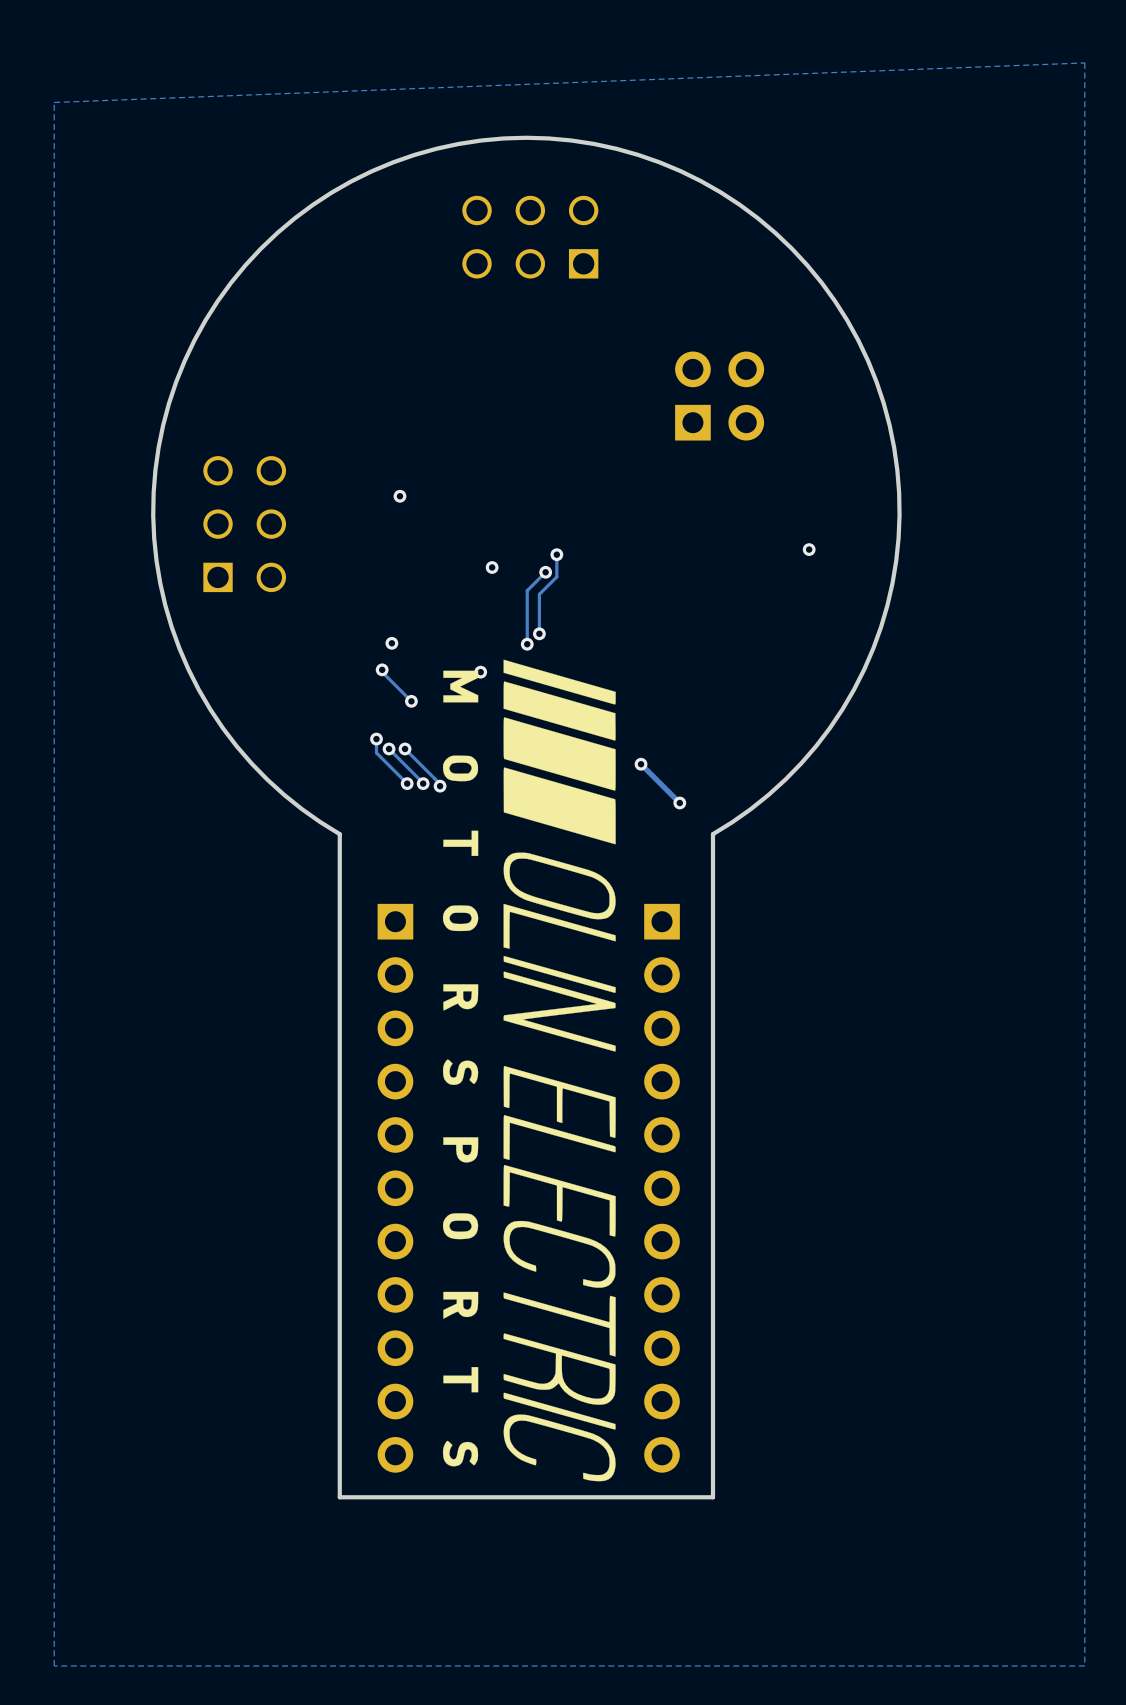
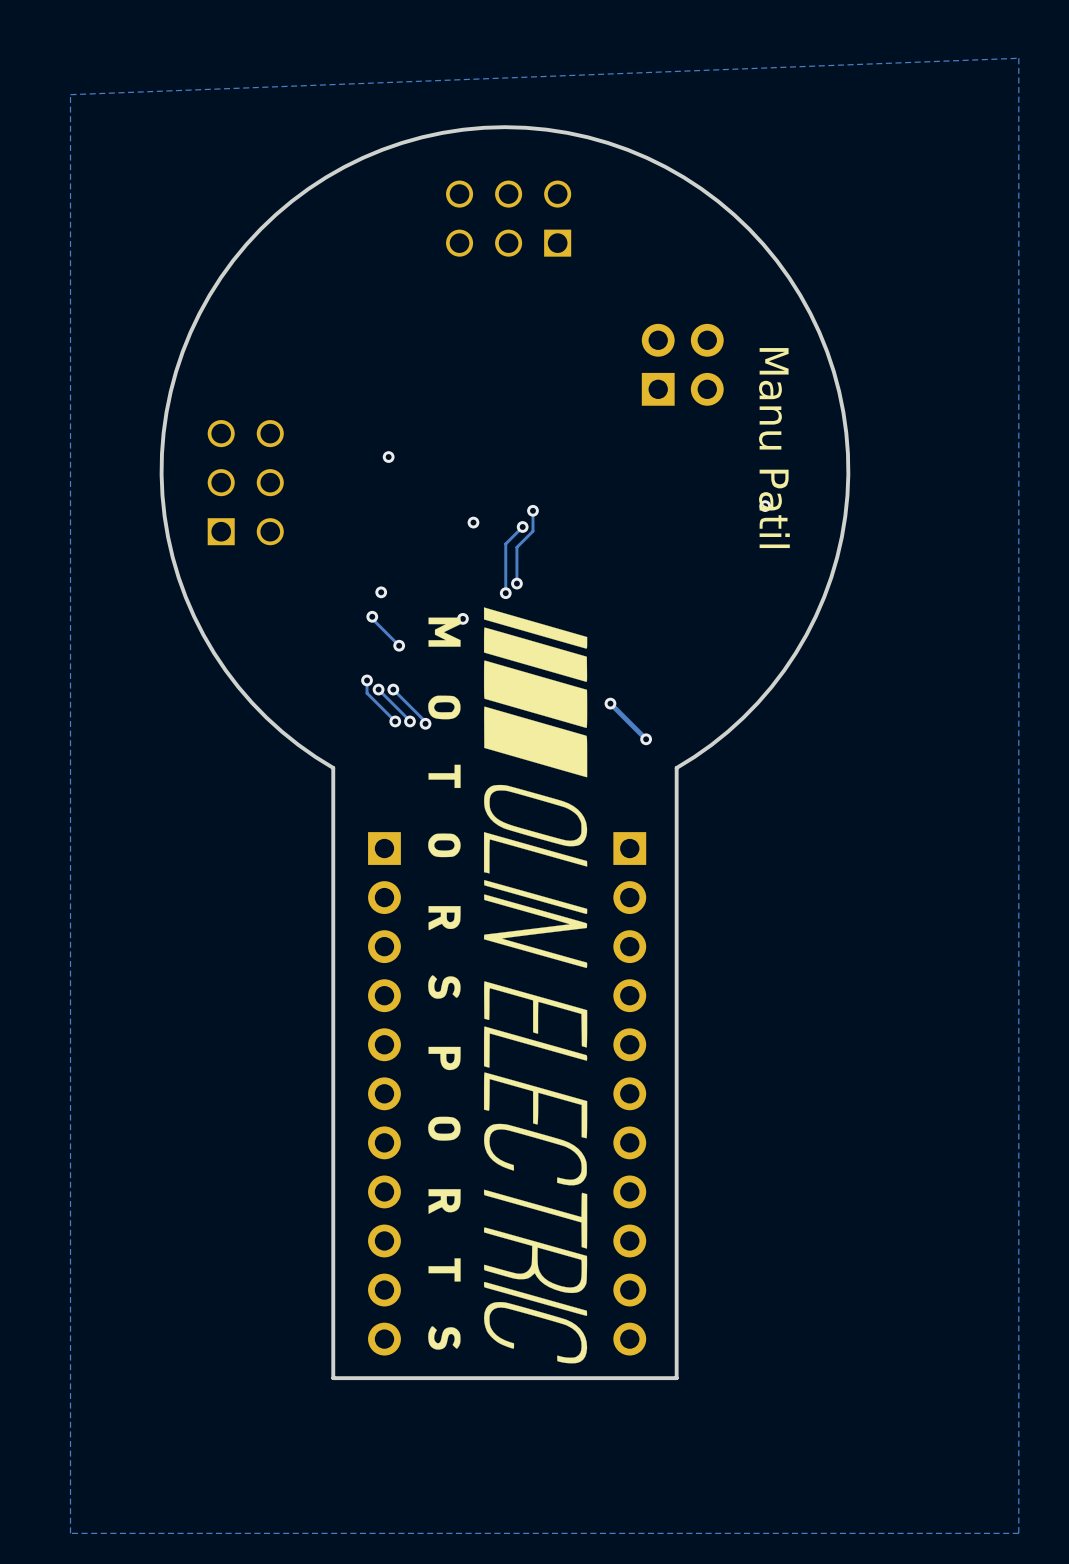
text: none -> Manu Patil (774, 448)

